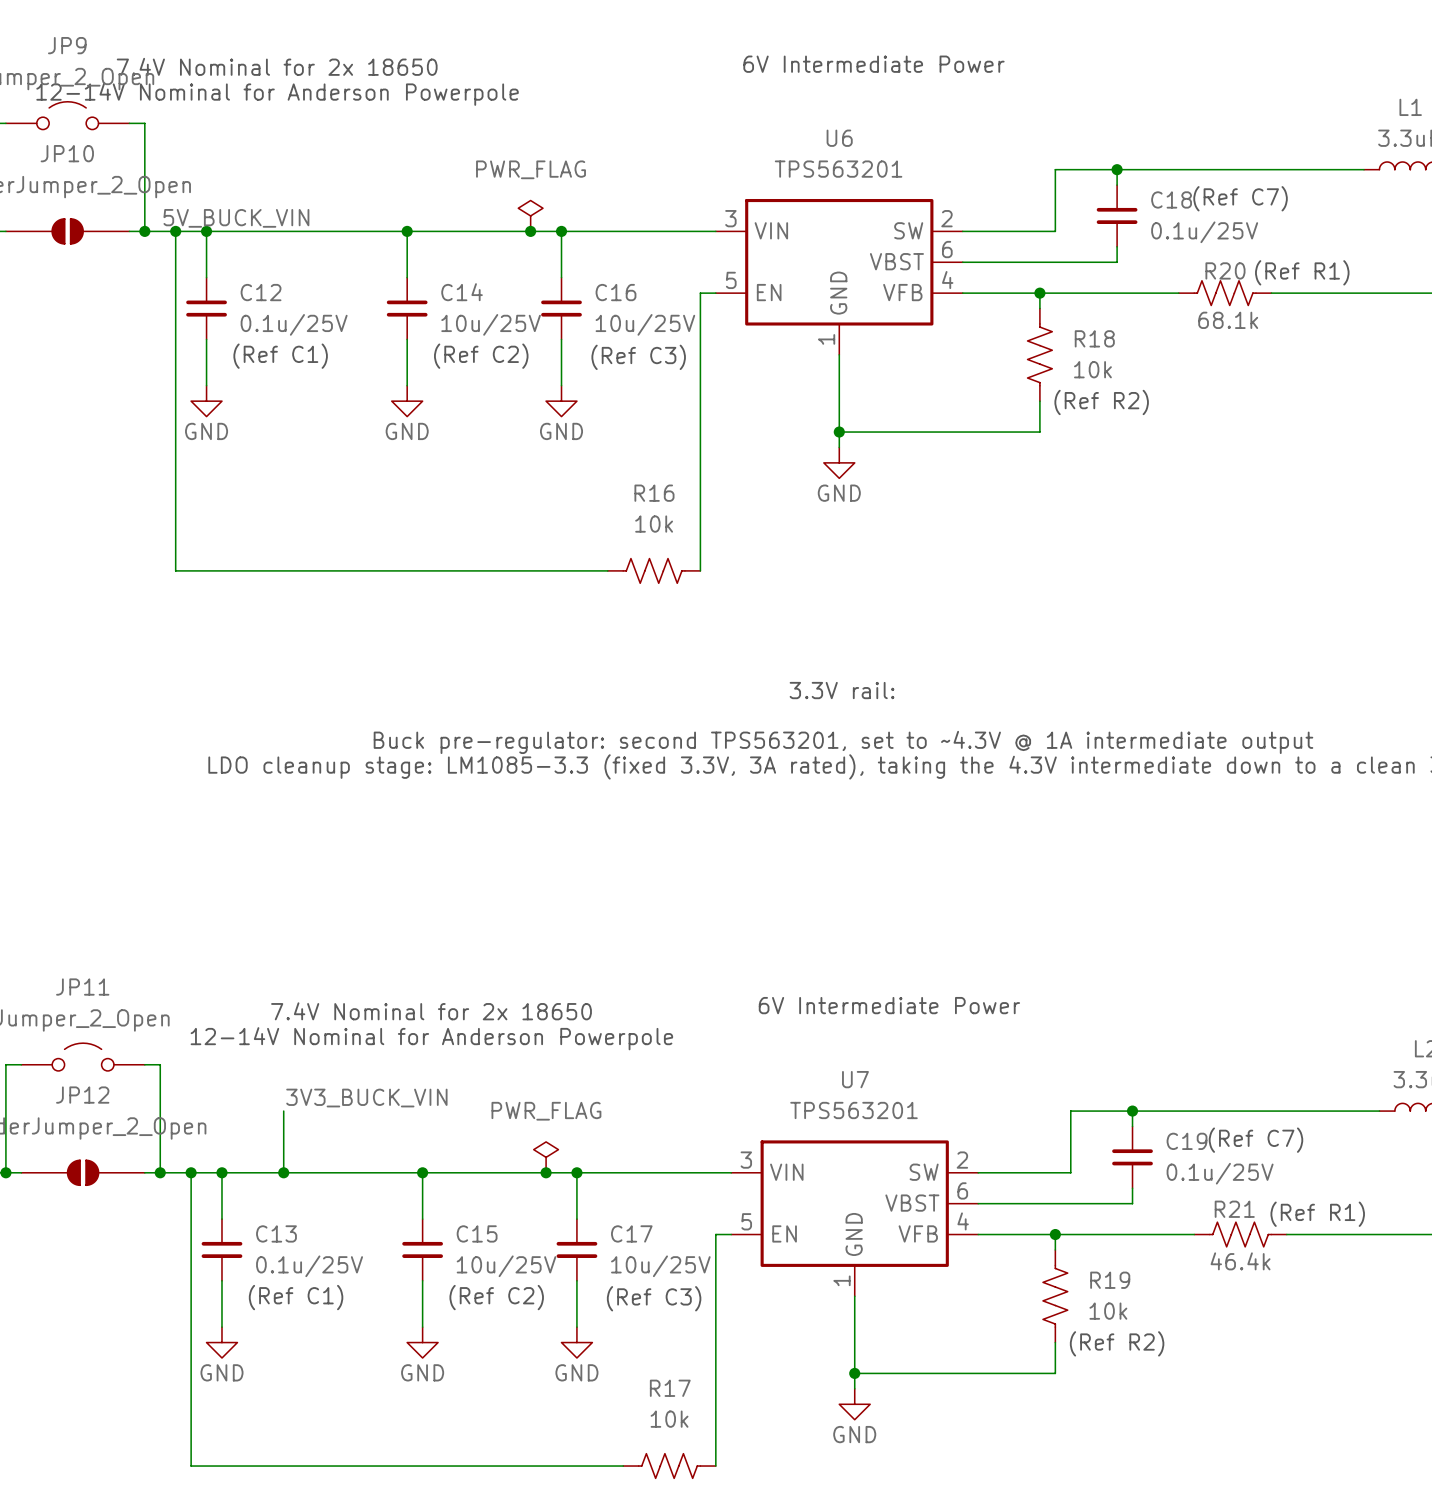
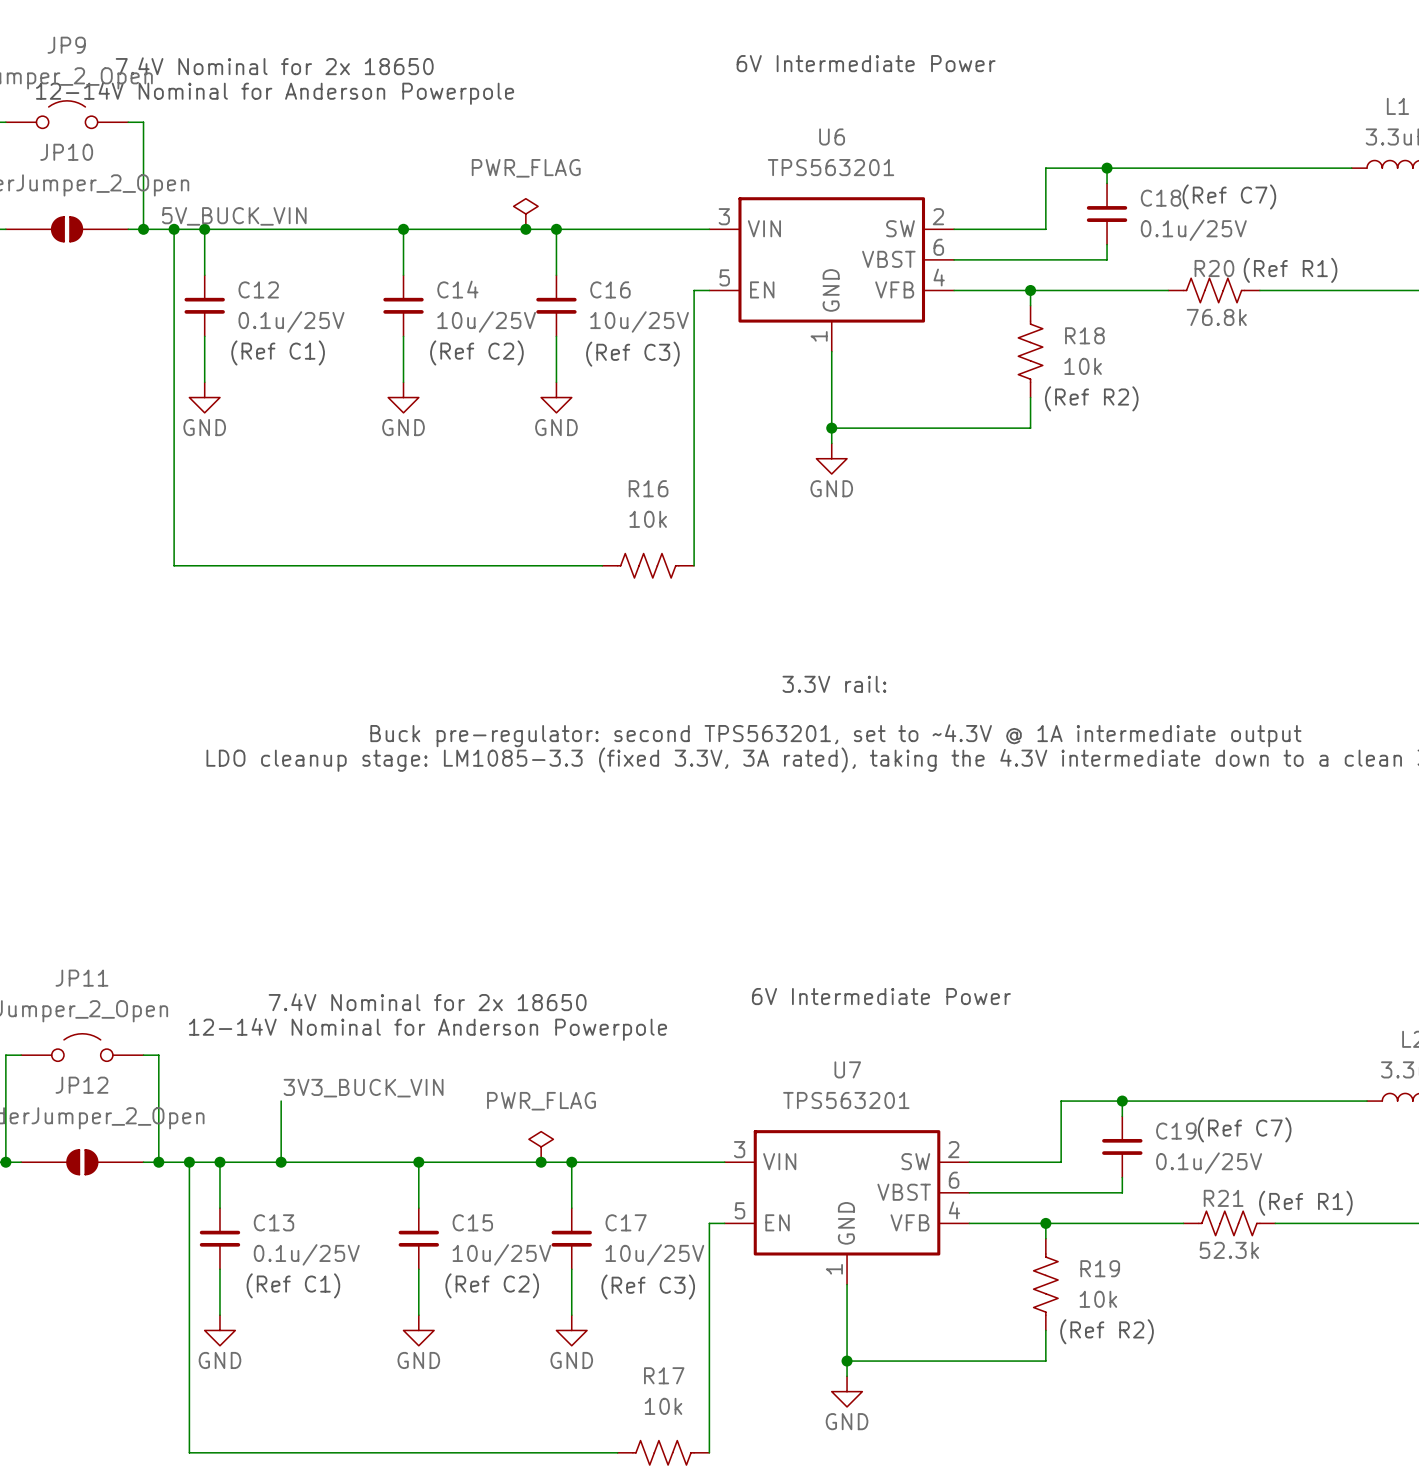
R20 value: 68.1k (1228, 320) -> 76.8k (1216, 317)
R21 value: 46.4k (1240, 1261) -> 52.3k (1229, 1250)

